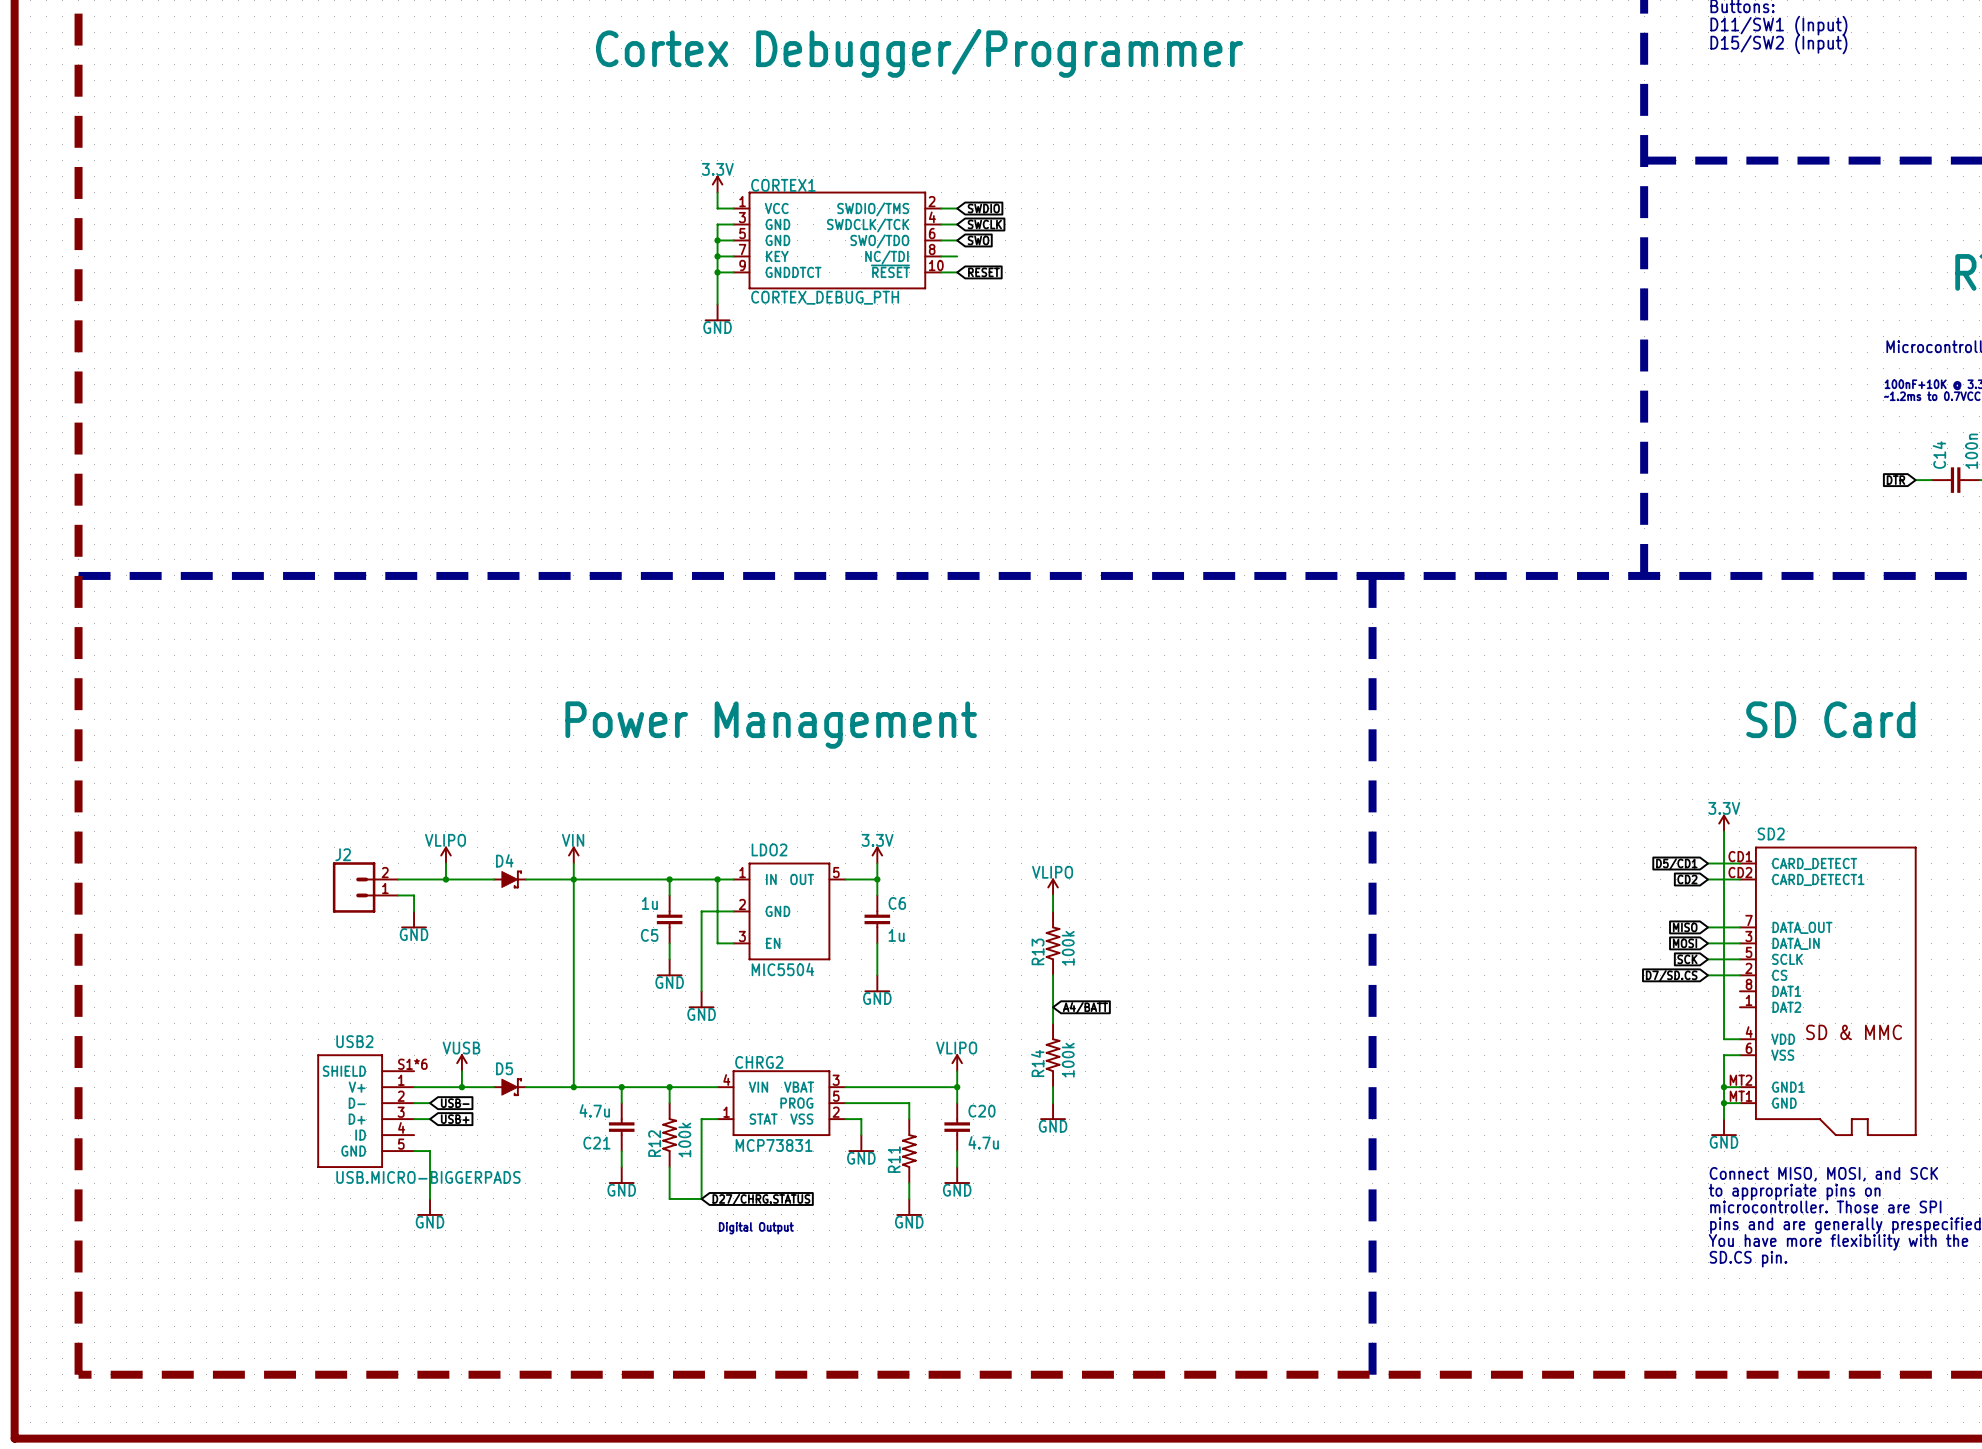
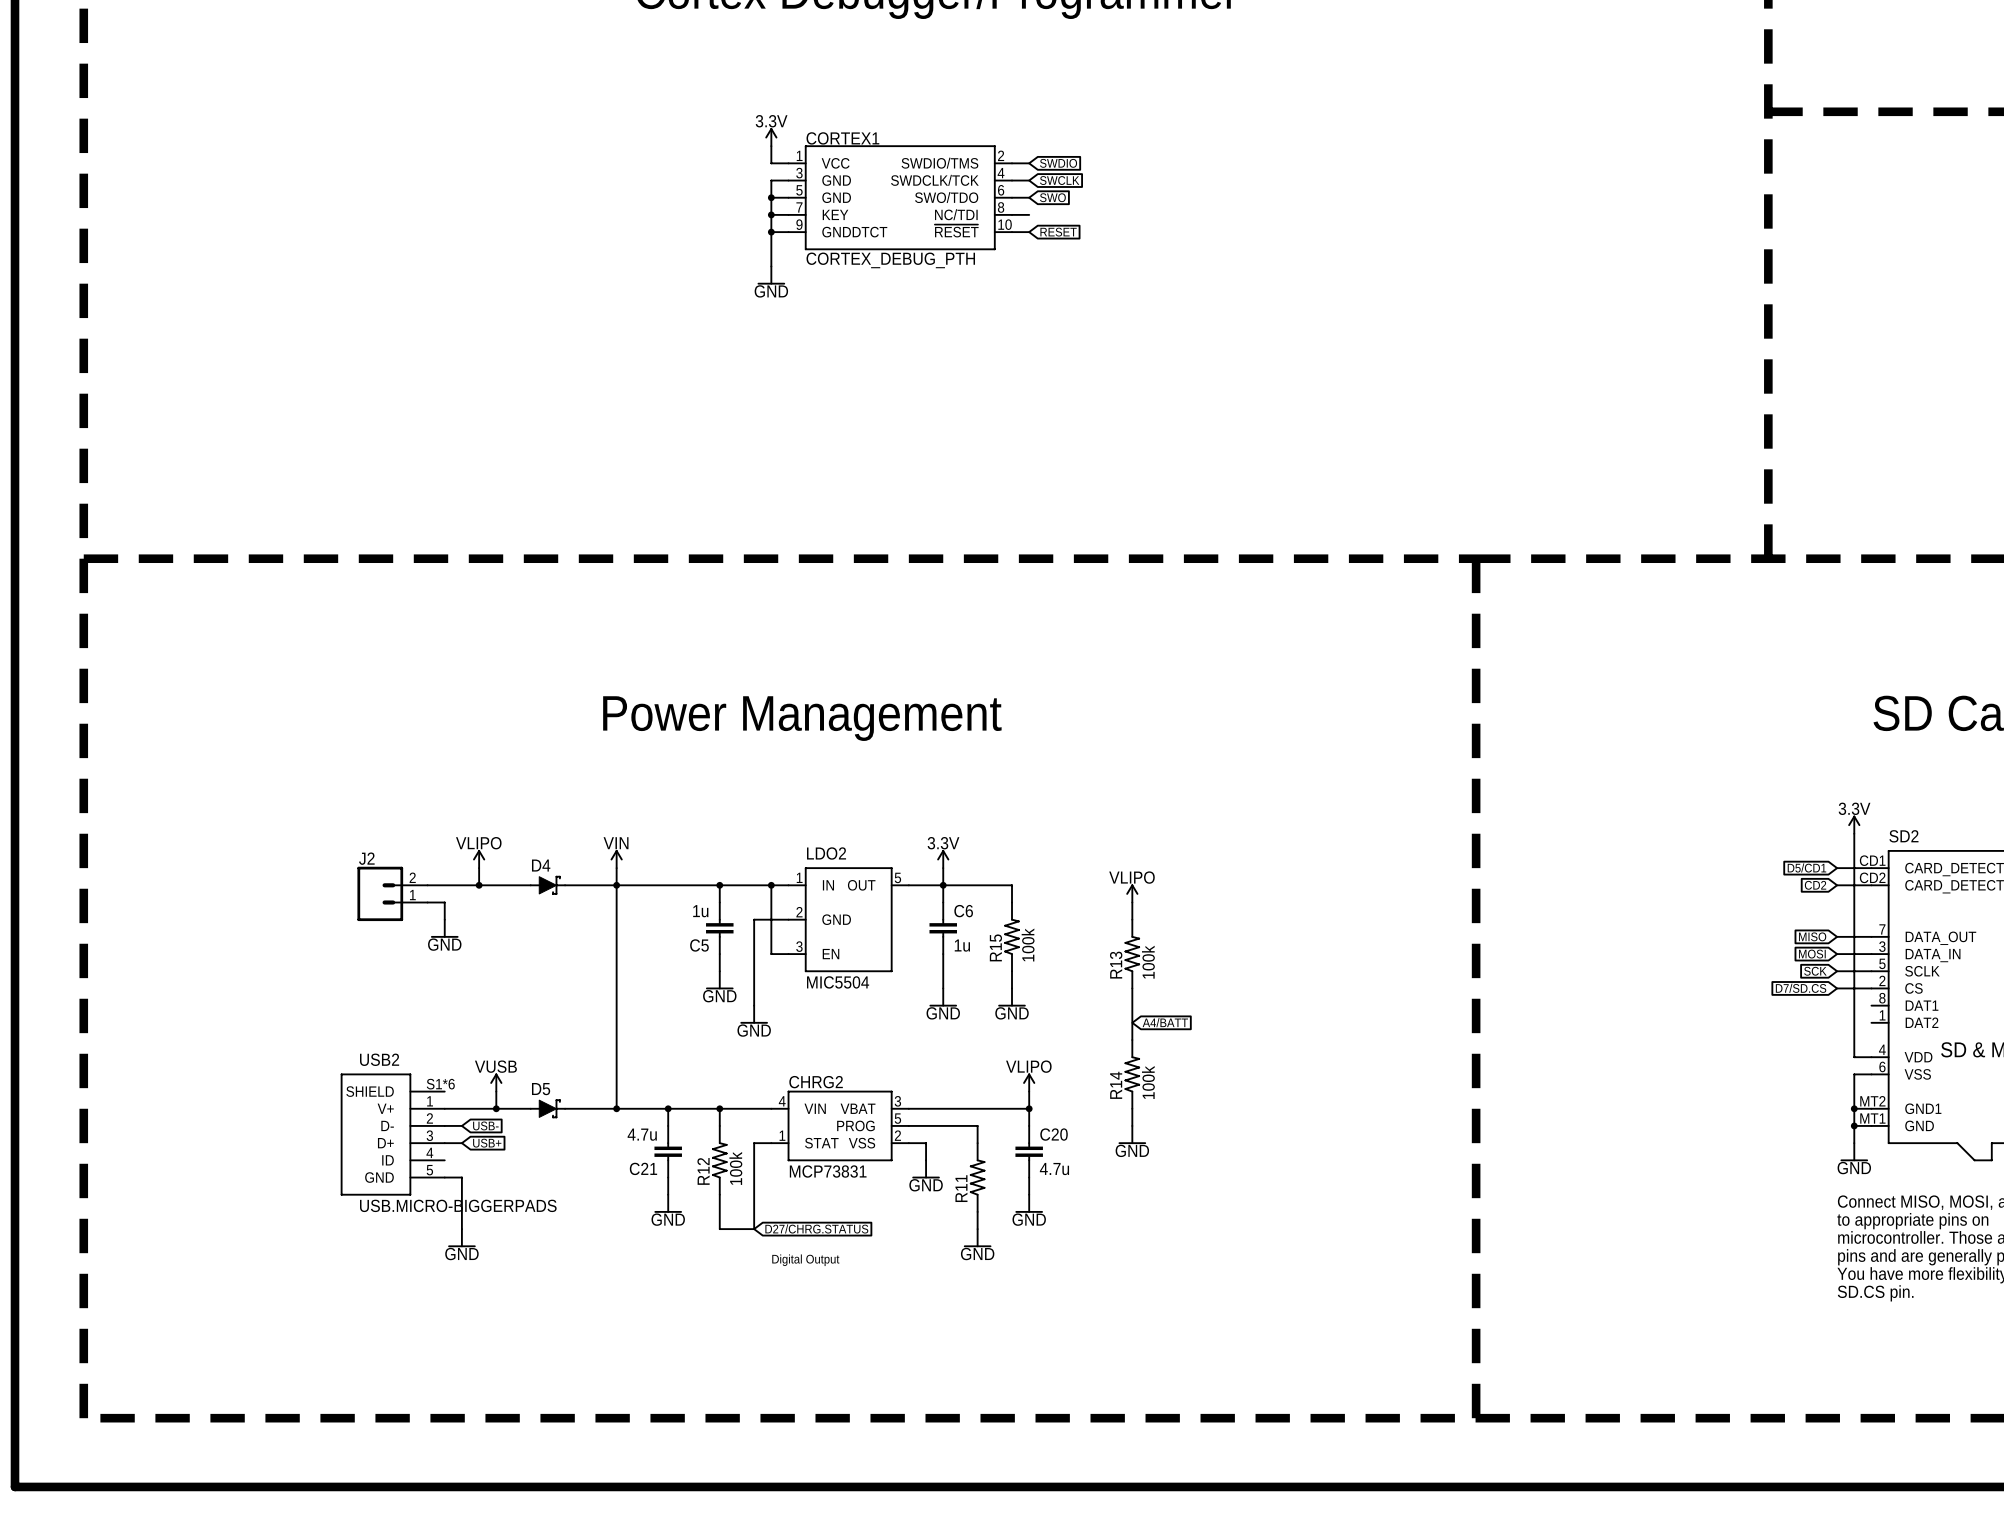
wire: none -> (943, 885) (1012, 885) (1012, 902)
R15: none -> 100k (1012, 936)
wire: none -> (1012, 971) (1012, 988)
power symbol: none -> GND (1012, 997)

